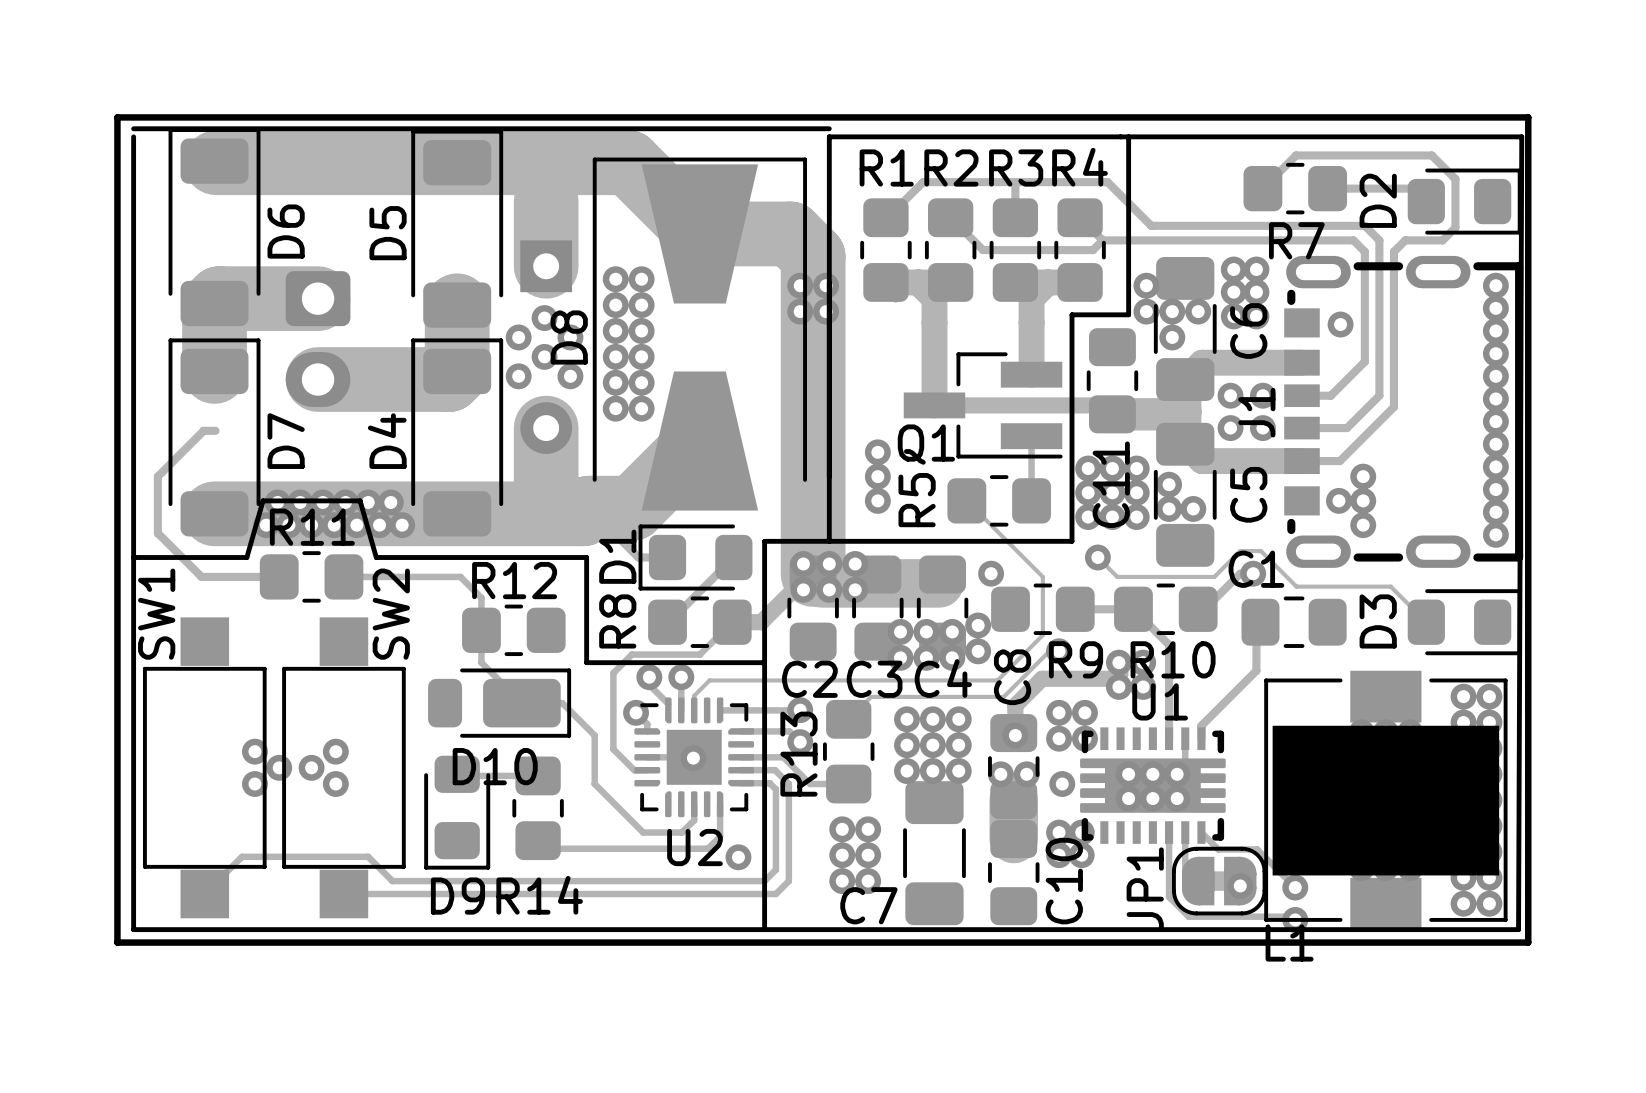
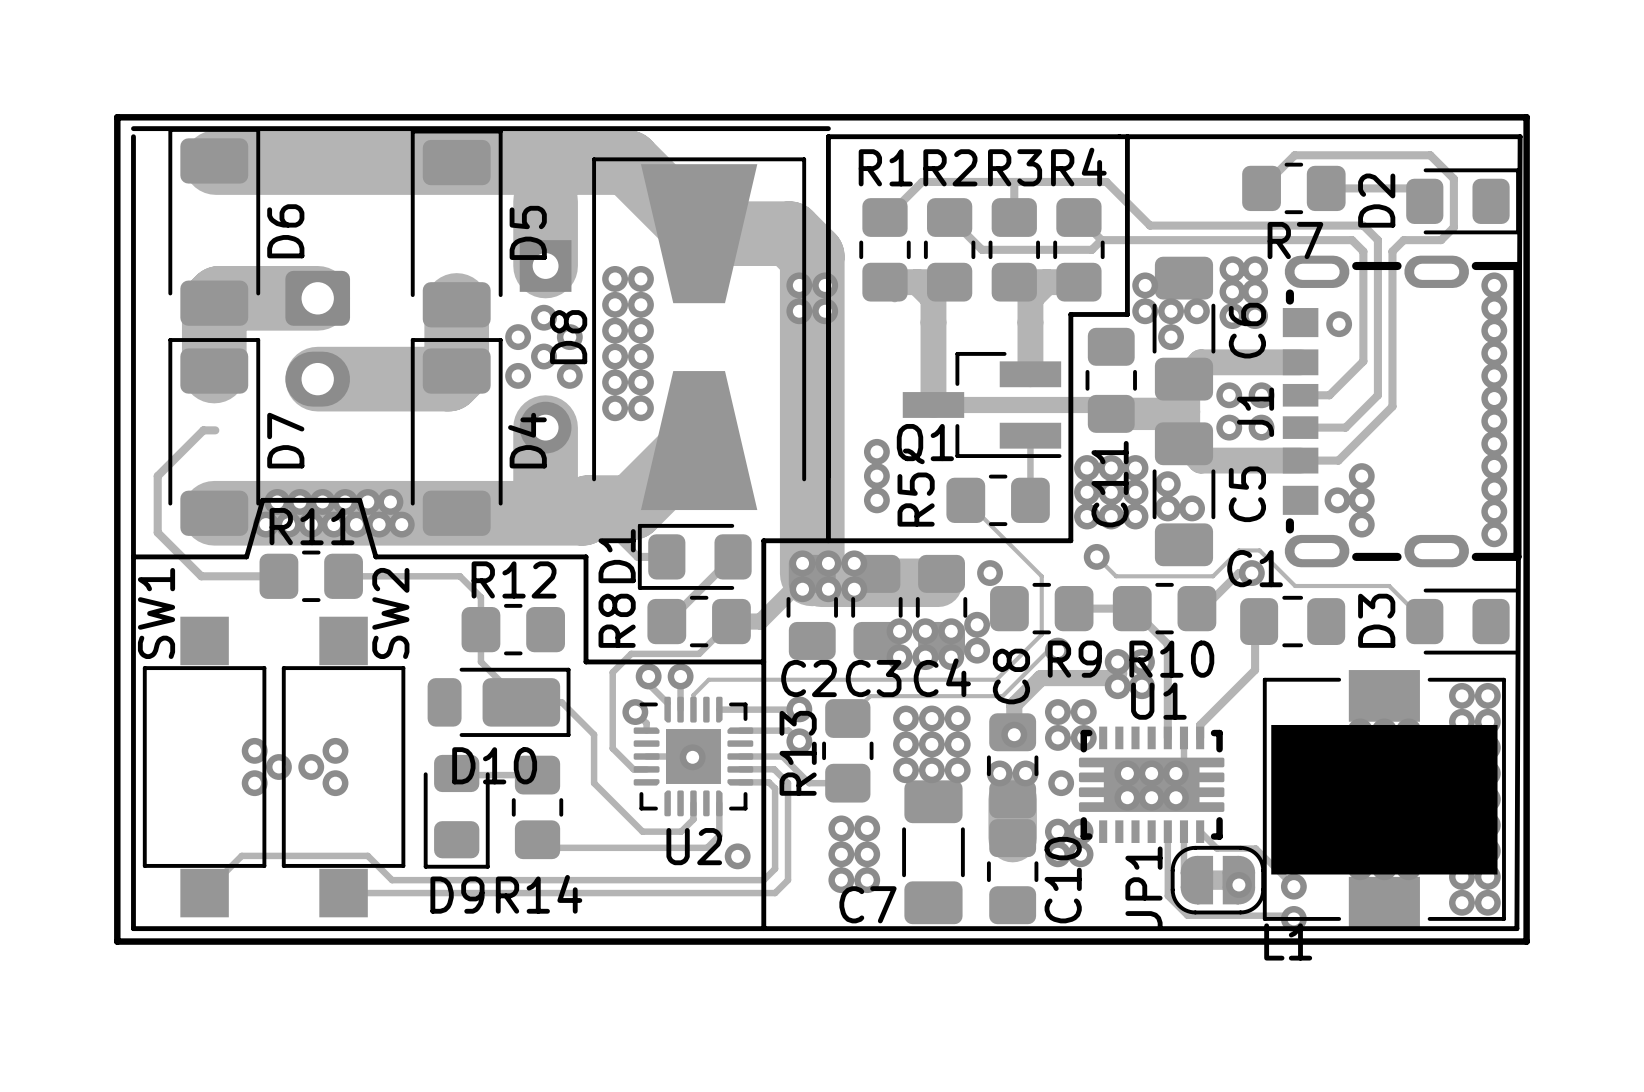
D5 name position: D5 (388, 233) -> D5 (528, 232)
D4 name position: D4 (387, 441) -> D4 (527, 440)

